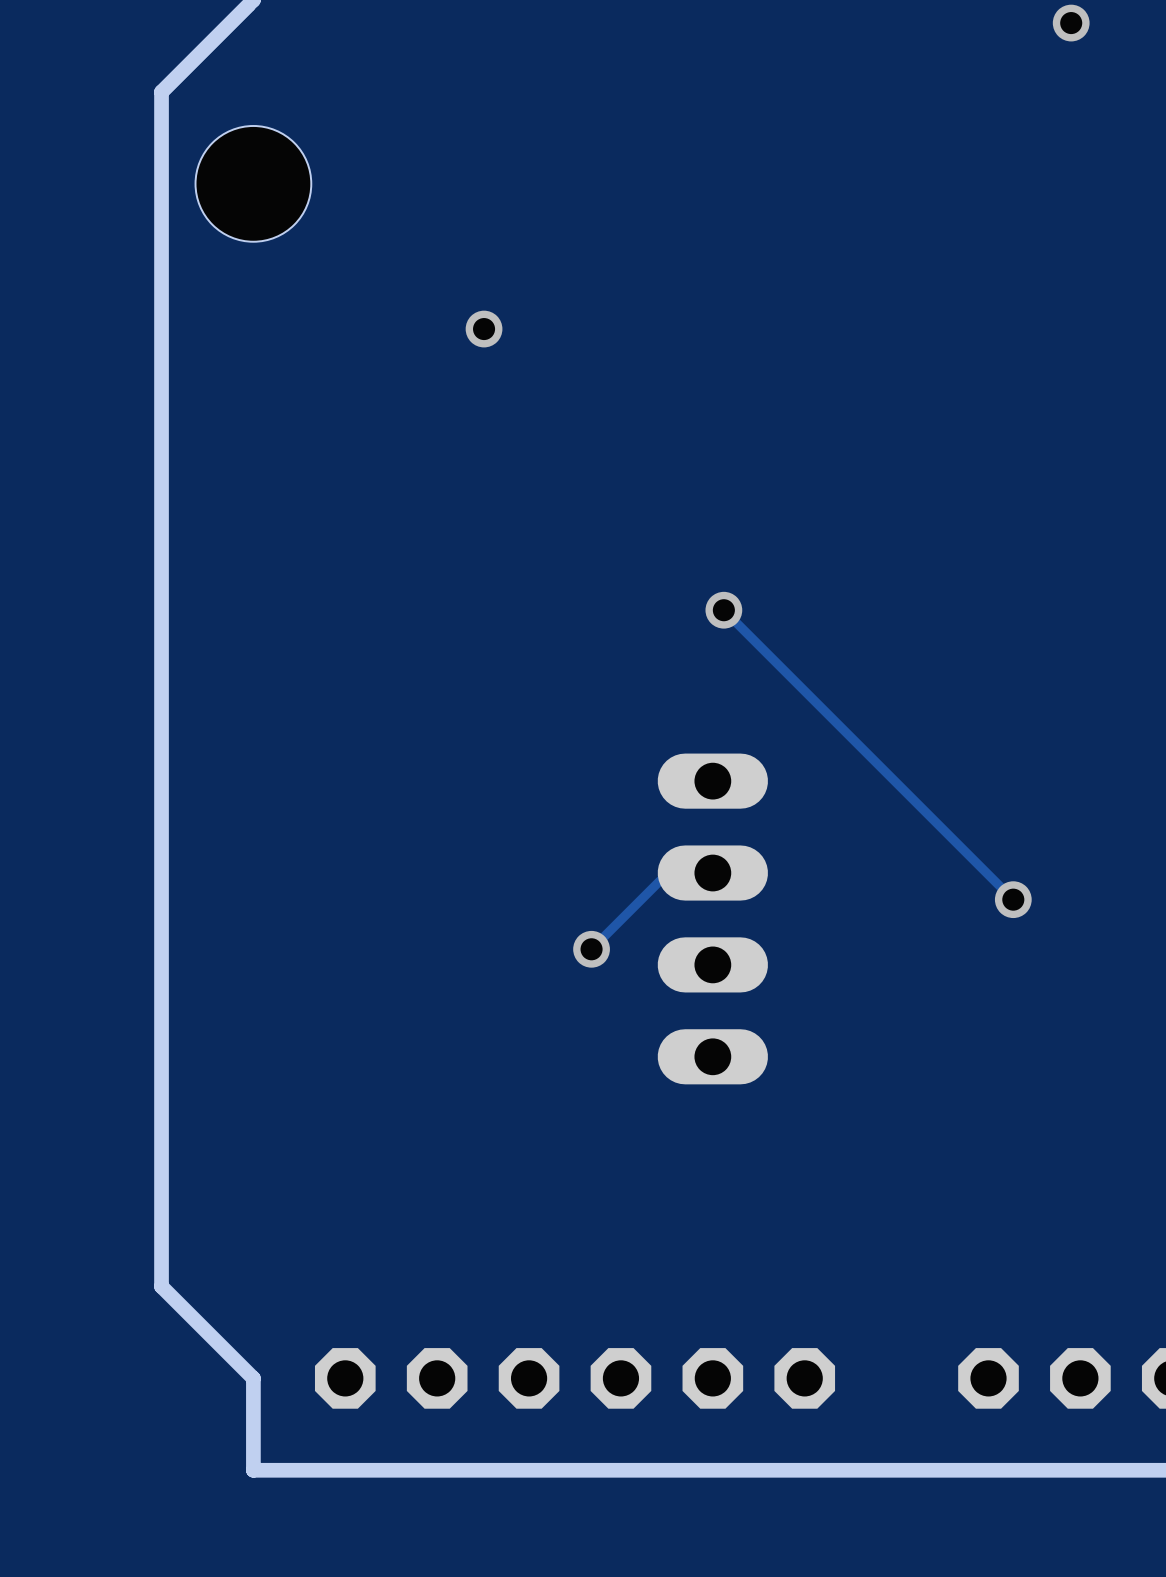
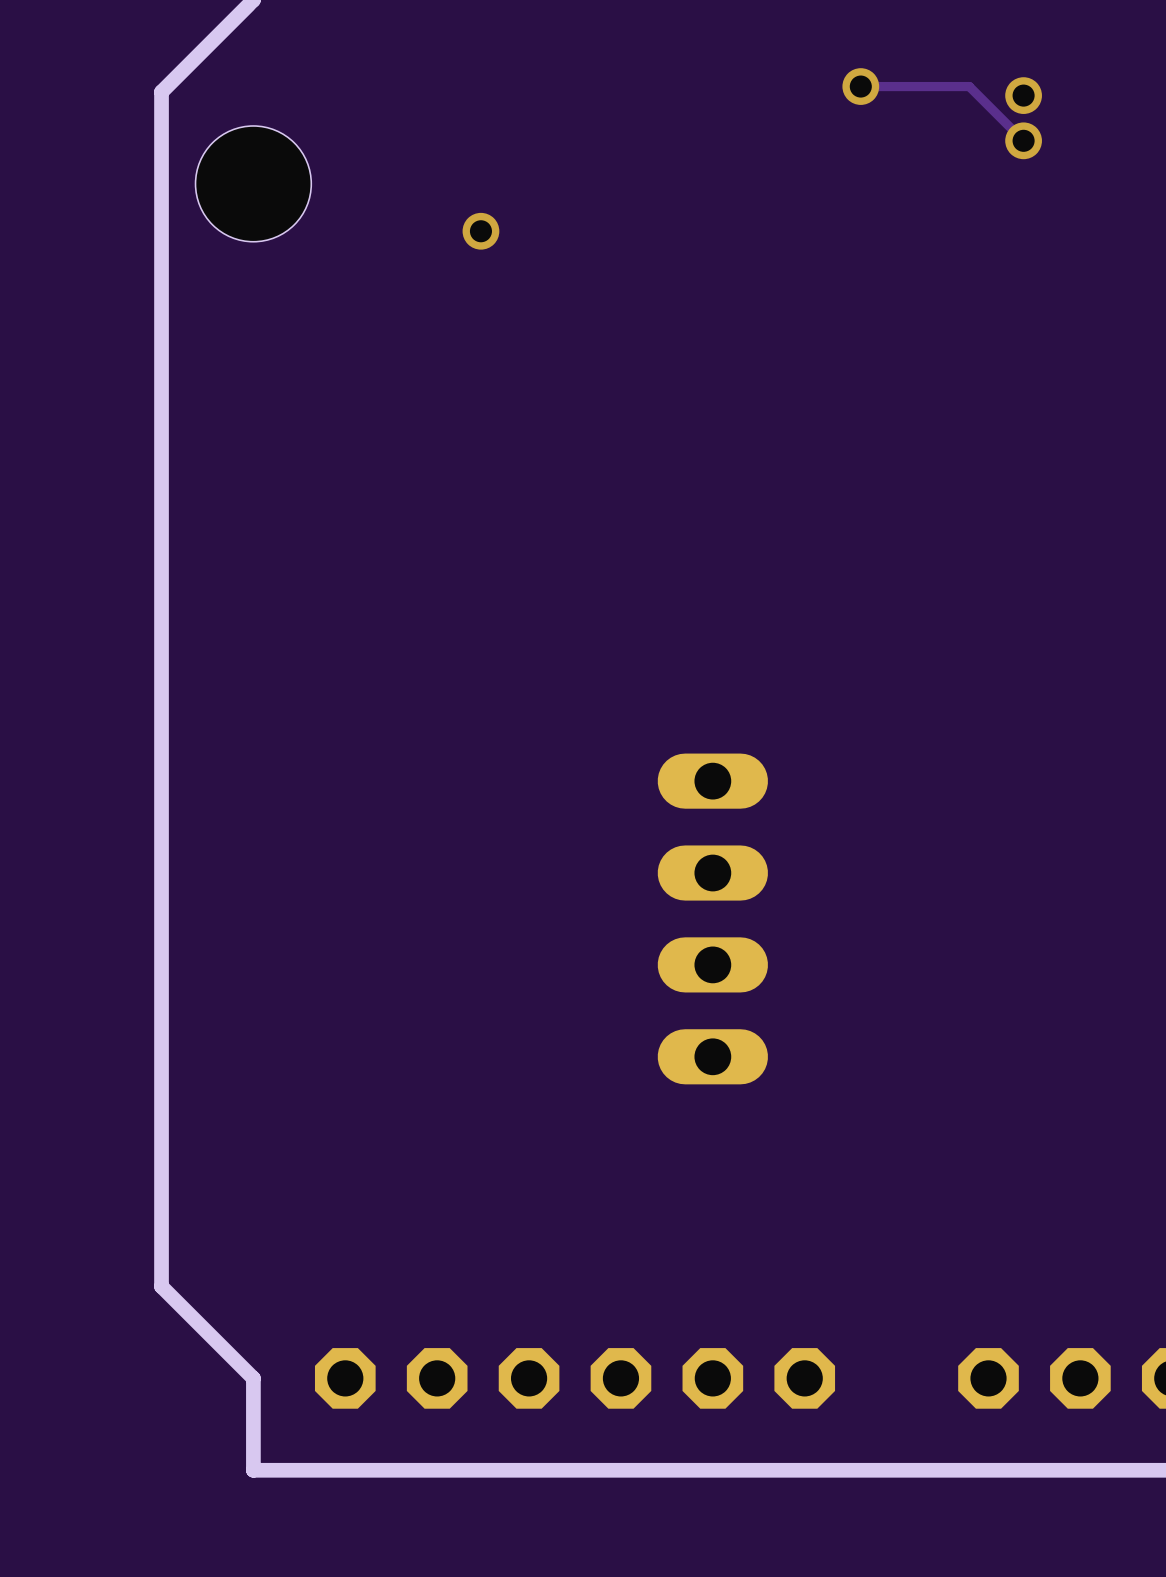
via: (1071, 23) -> none
track: none -> (860, 86) (969, 86) (1023, 140)
via: none -> (860, 86)
via: none -> (1023, 95)
via: none -> (1023, 140)
via position: (484, 329) -> (480, 231)
track: (723, 610) (1013, 899) -> none
via: (723, 610) -> none
track: (712, 873) (707, 874) (665, 874) (591, 949) -> none
via: (1013, 899) -> none
via: (591, 949) -> none

